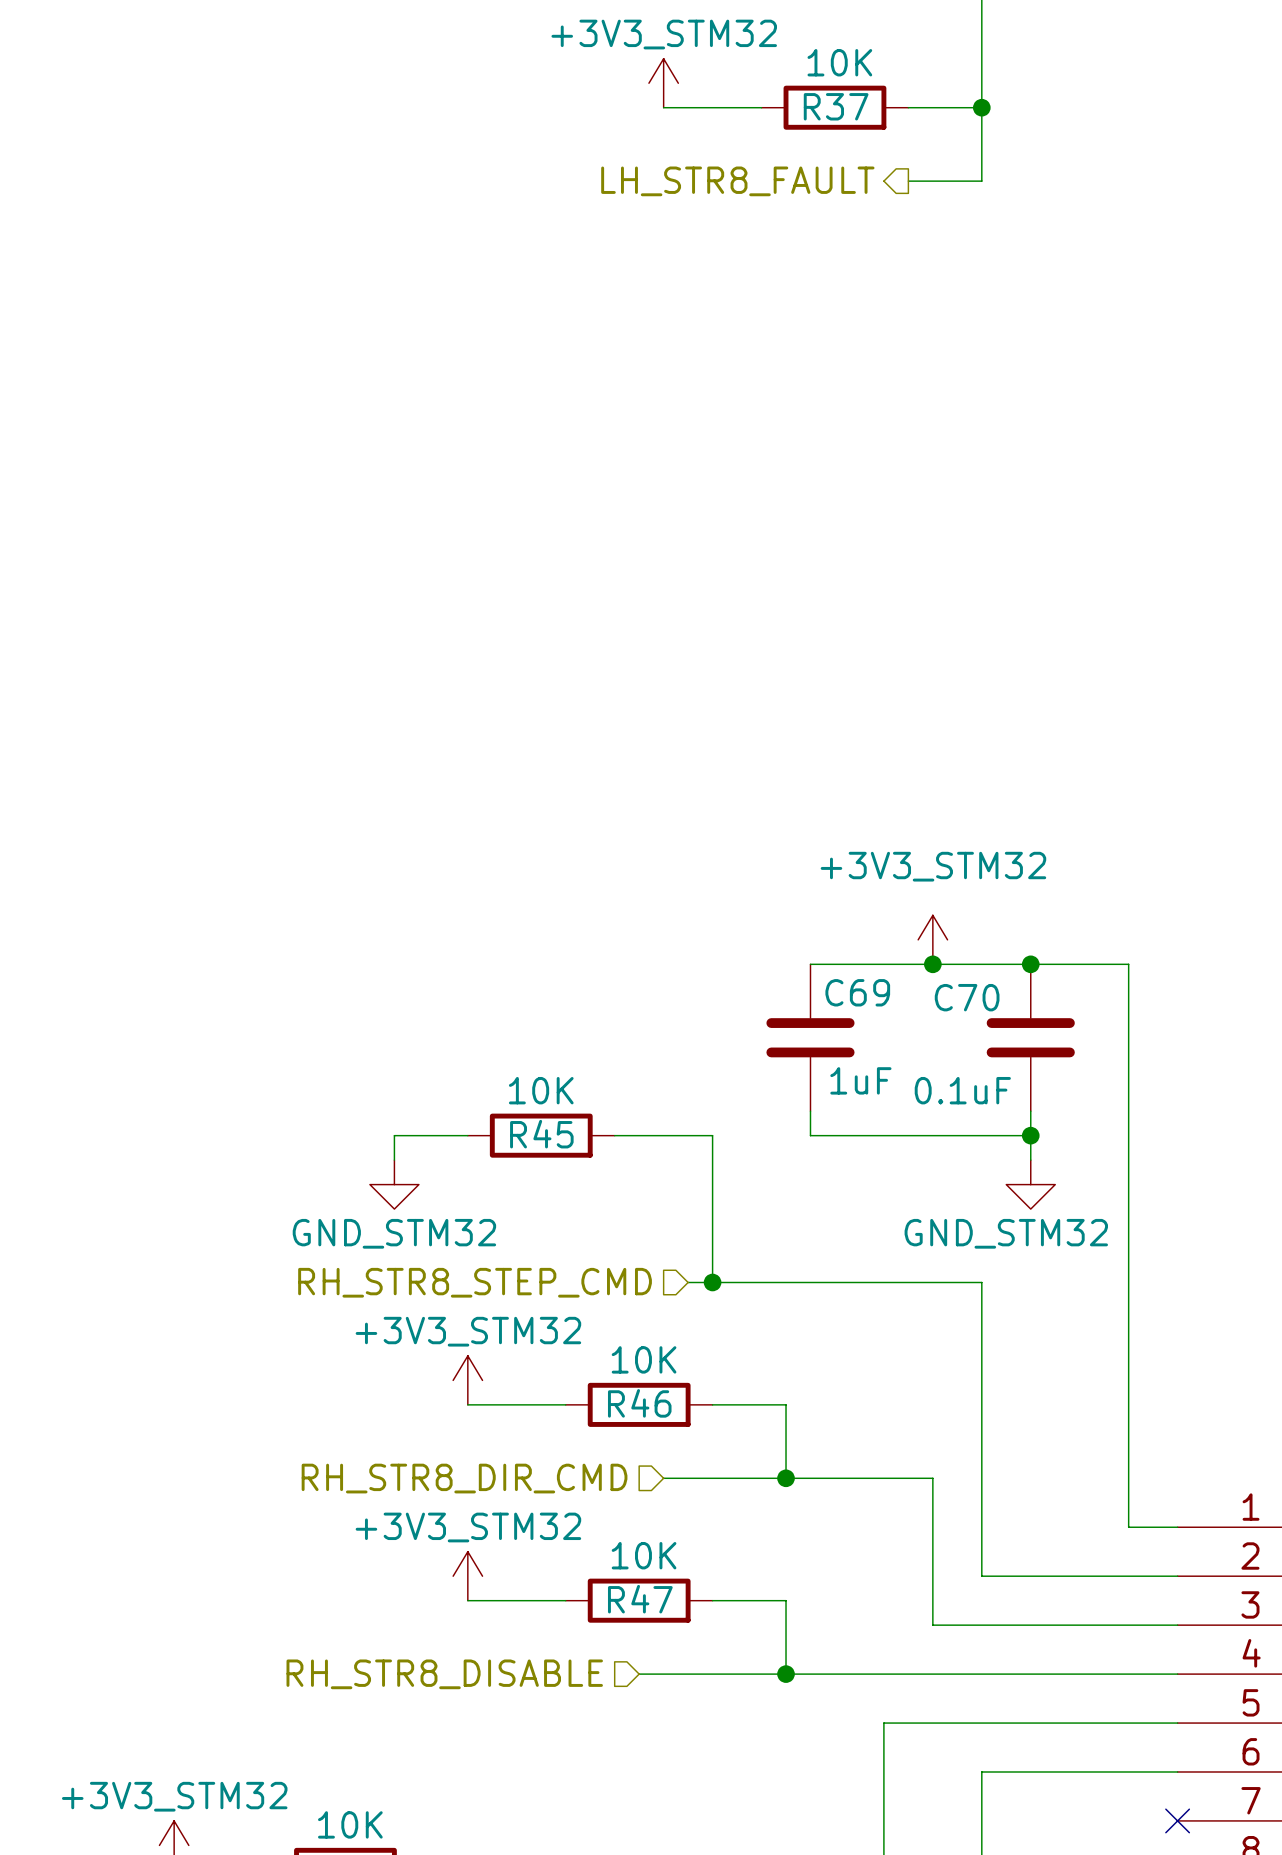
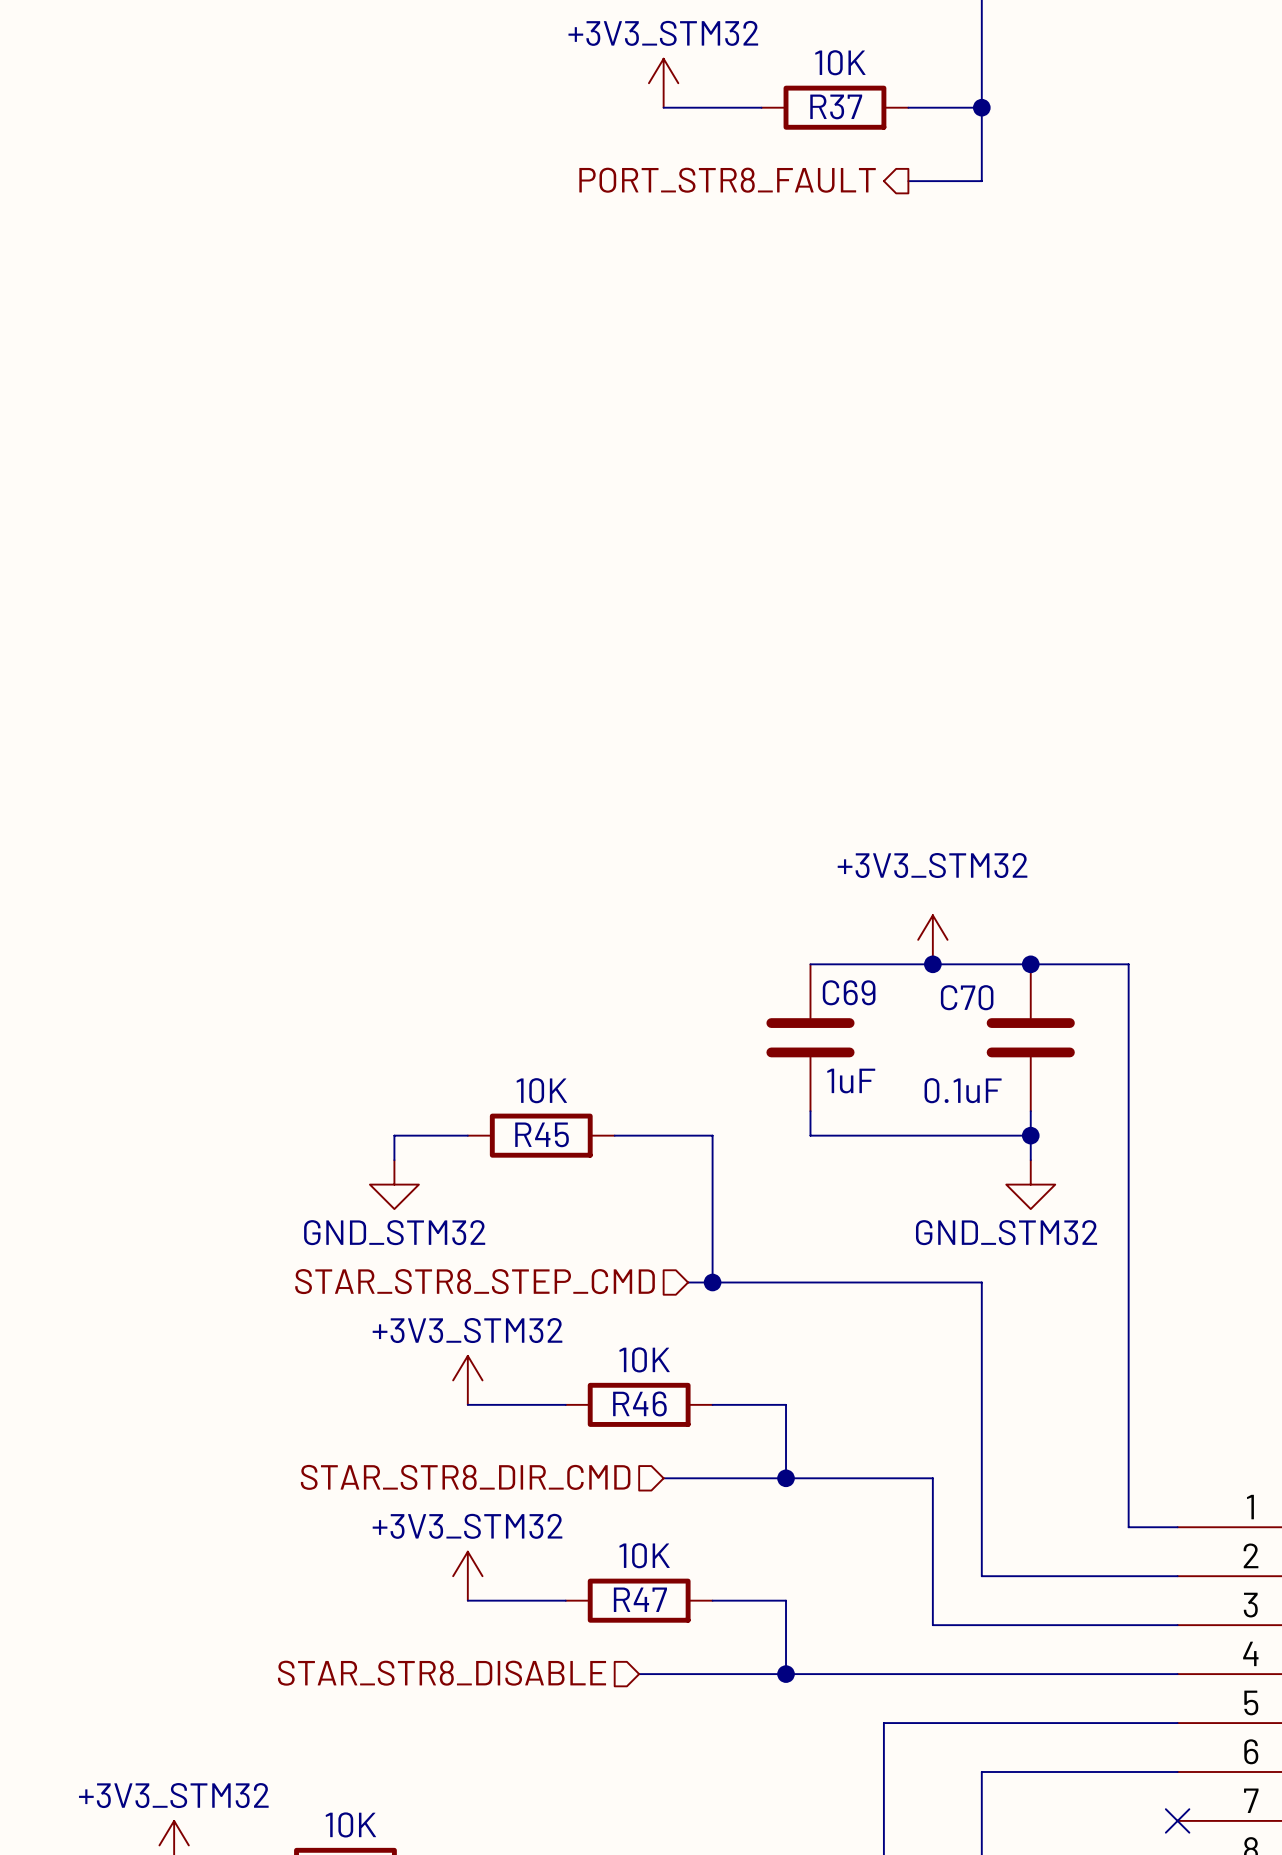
hierarchical label: LH_STR8_FAULT (737, 181) -> PORT_STR8_FAULT (727, 180)
hierarchical label: RH_STR8_STEP_CMD (475, 1282) -> STAR_STR8_STEP_CMD (475, 1281)
hierarchical label: RH_STR8_DIR_CMD (464, 1478) -> STAR_STR8_DIR_CMD (465, 1477)
hierarchical label: RH_STR8_DISABLE (444, 1674) -> STAR_STR8_DISABLE (442, 1673)

